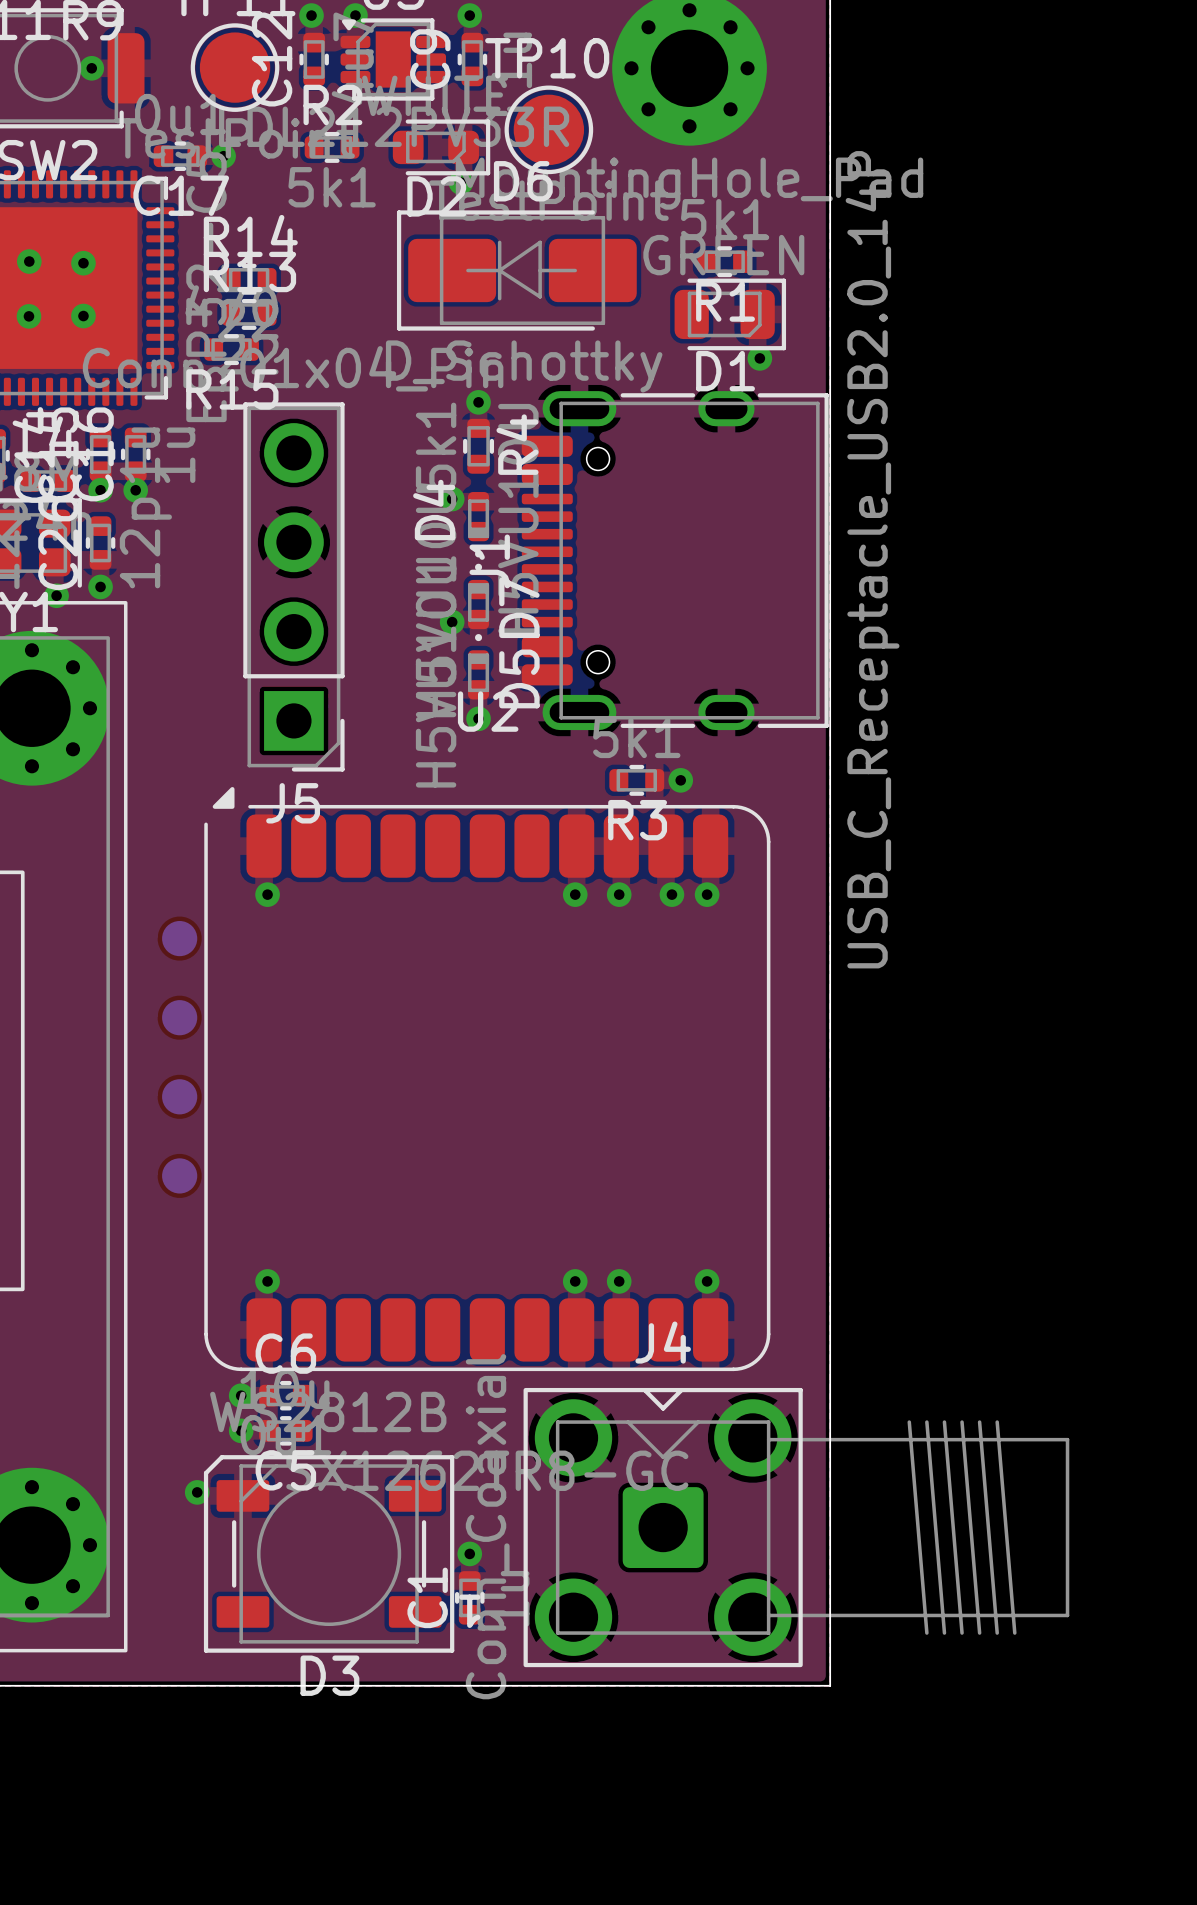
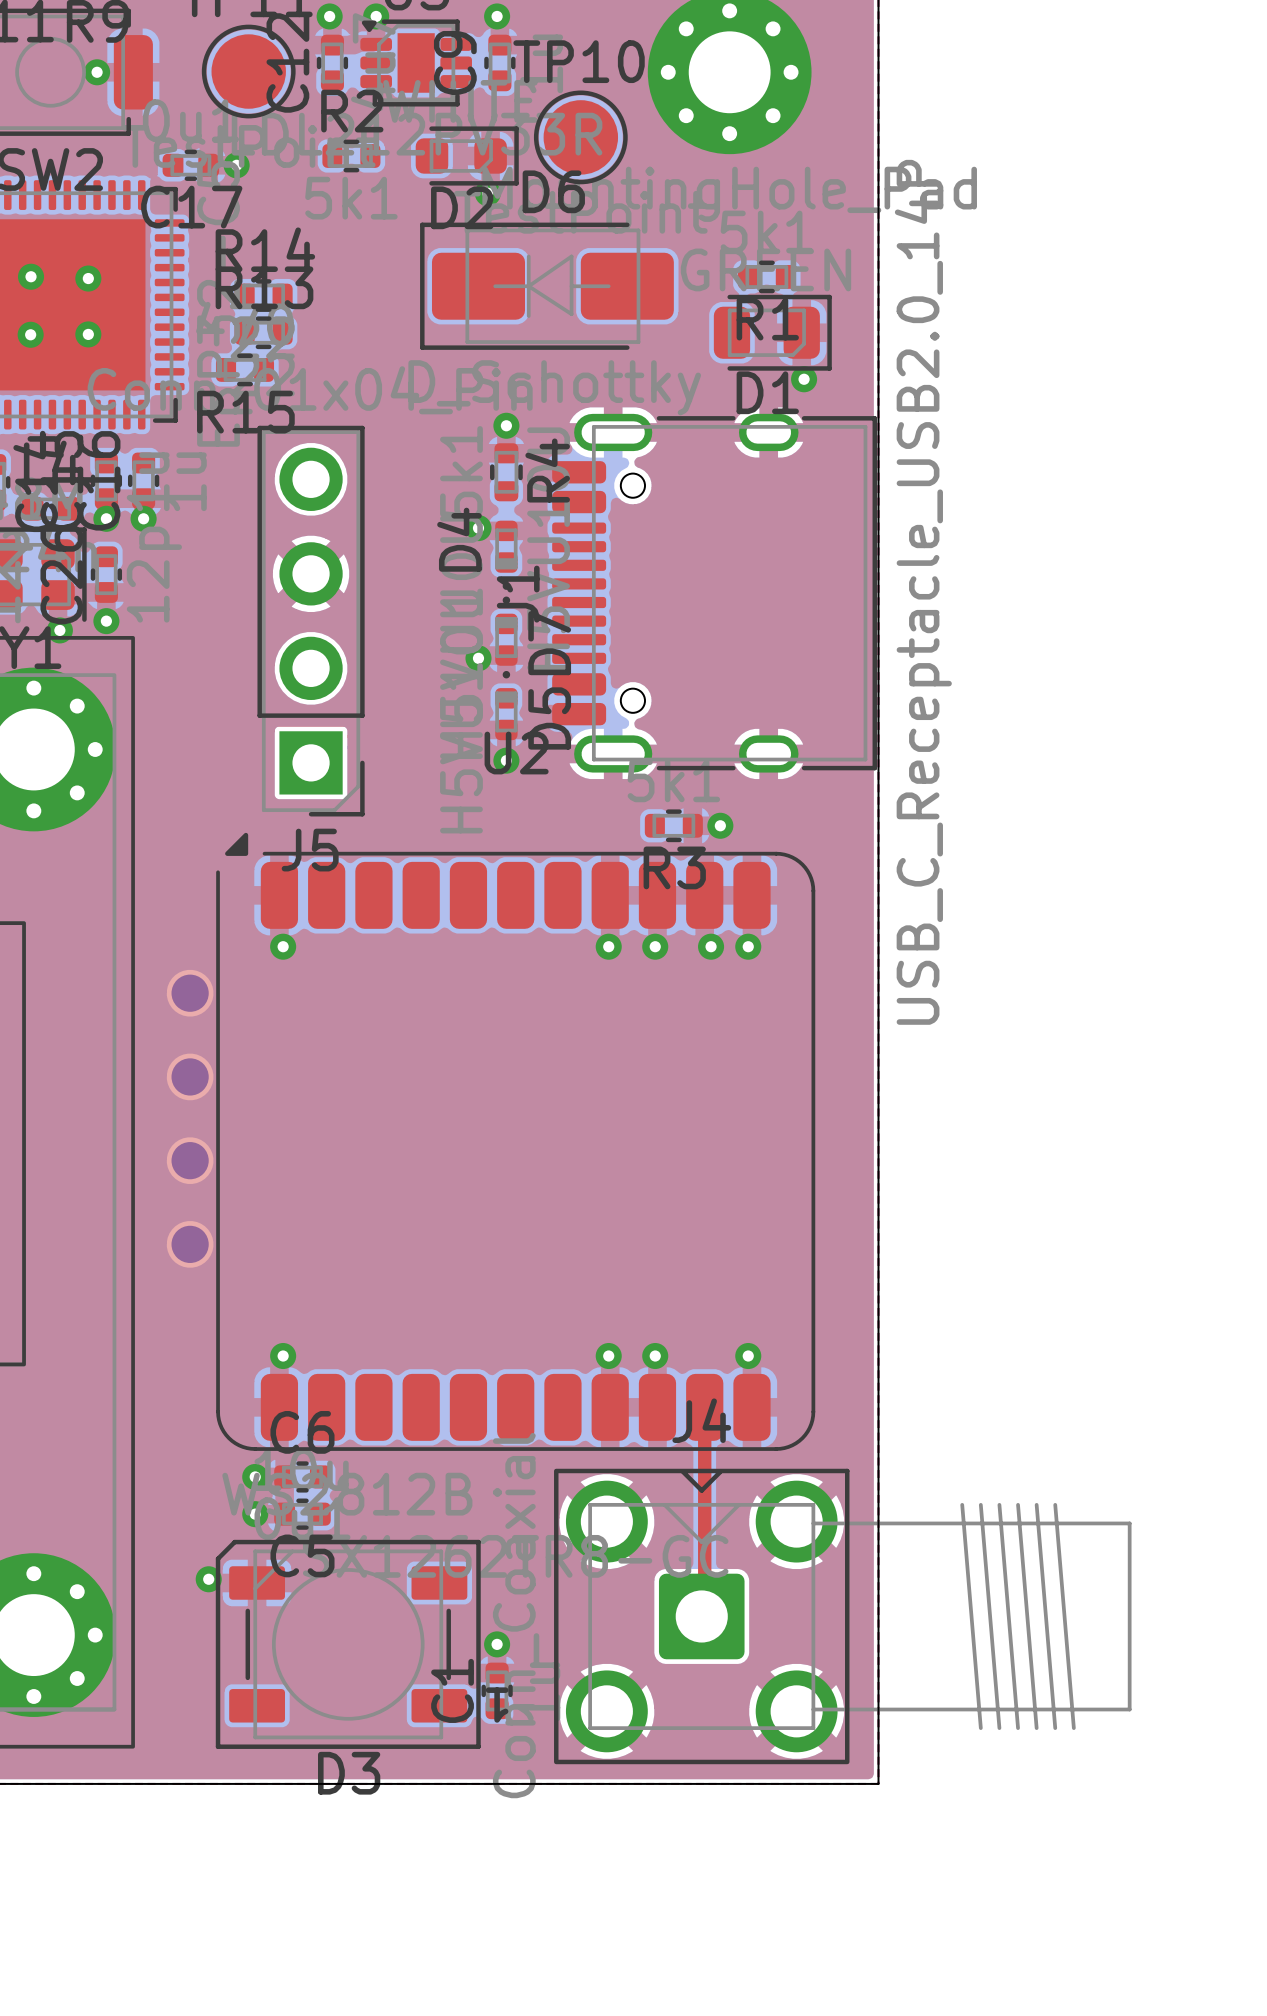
top track: none -> (704, 1407) (704, 1613) (701, 1616)

